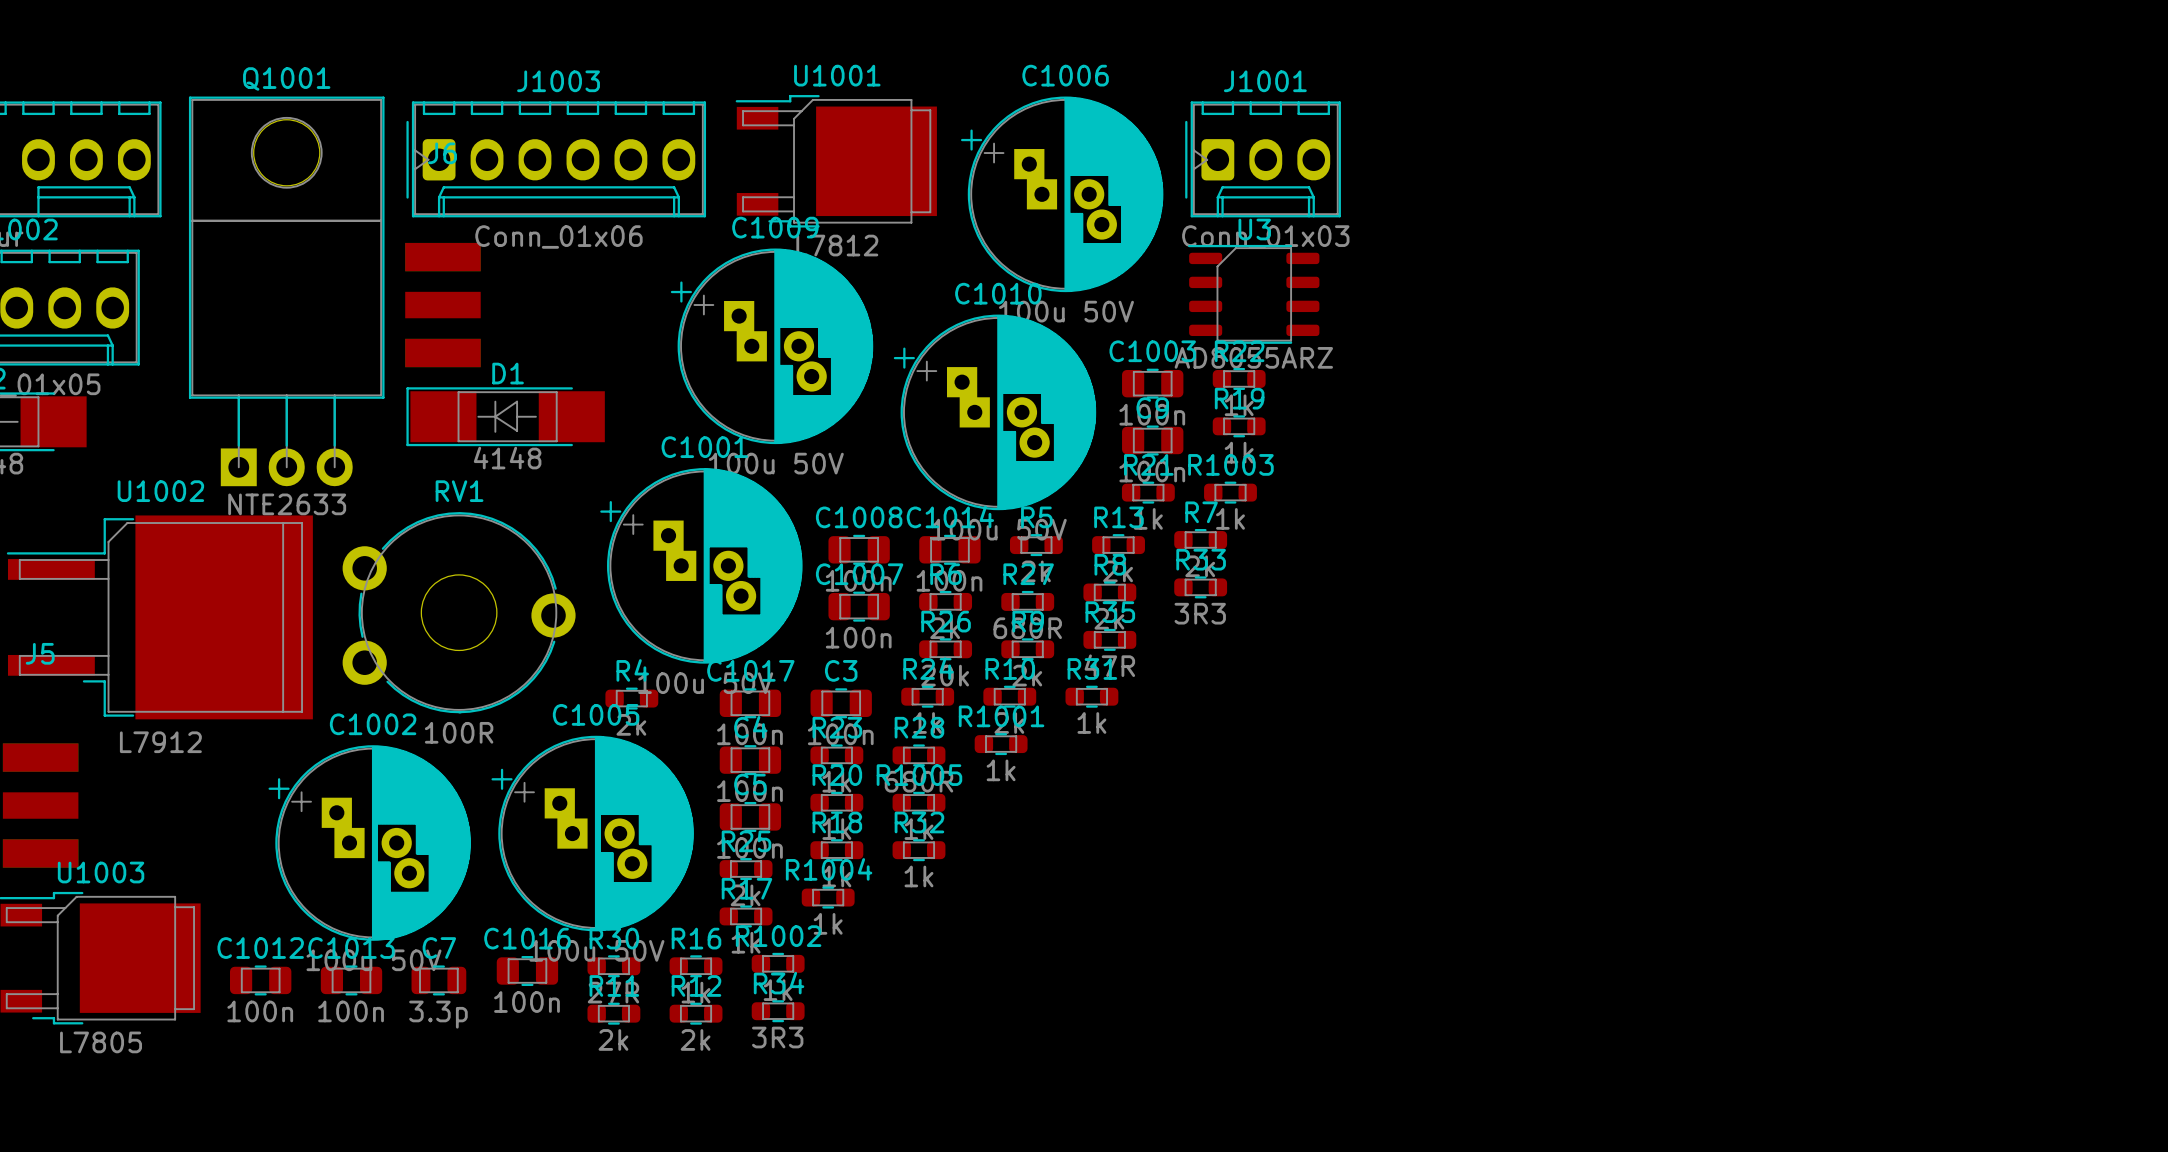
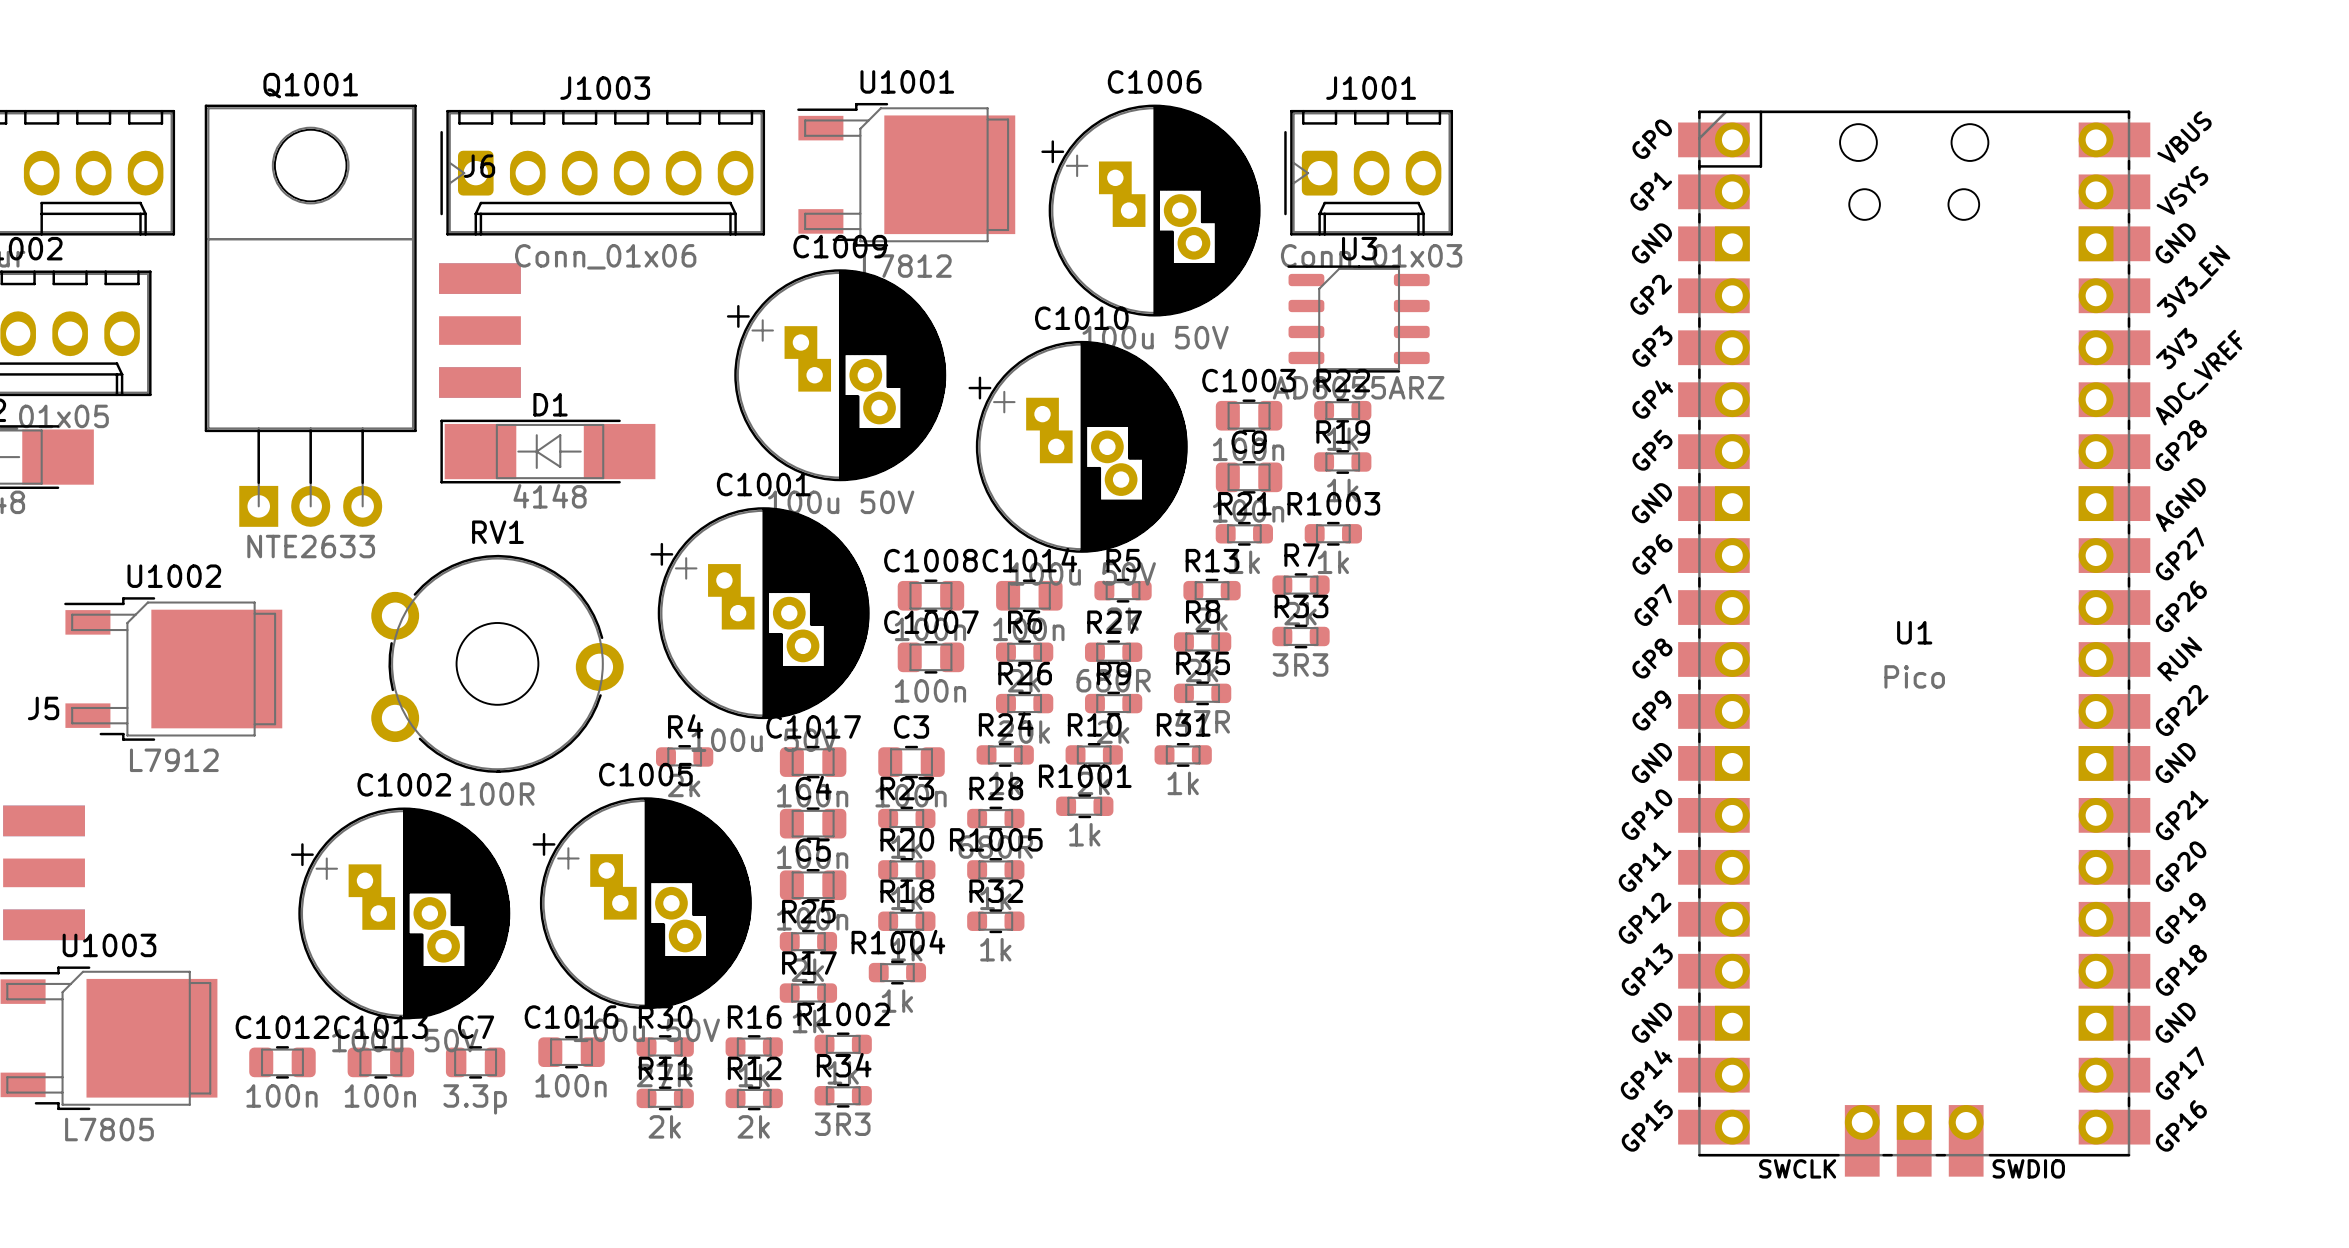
U1002 name position: U1002 (160, 491) -> U1002 (174, 576)
U1002 footprint: [6, 515, 313, 720] -> [64, 597, 283, 741]
U1: none -> Pico (1914, 643)
U1002 value position: L7912 (160, 742) -> L7912 (174, 760)

